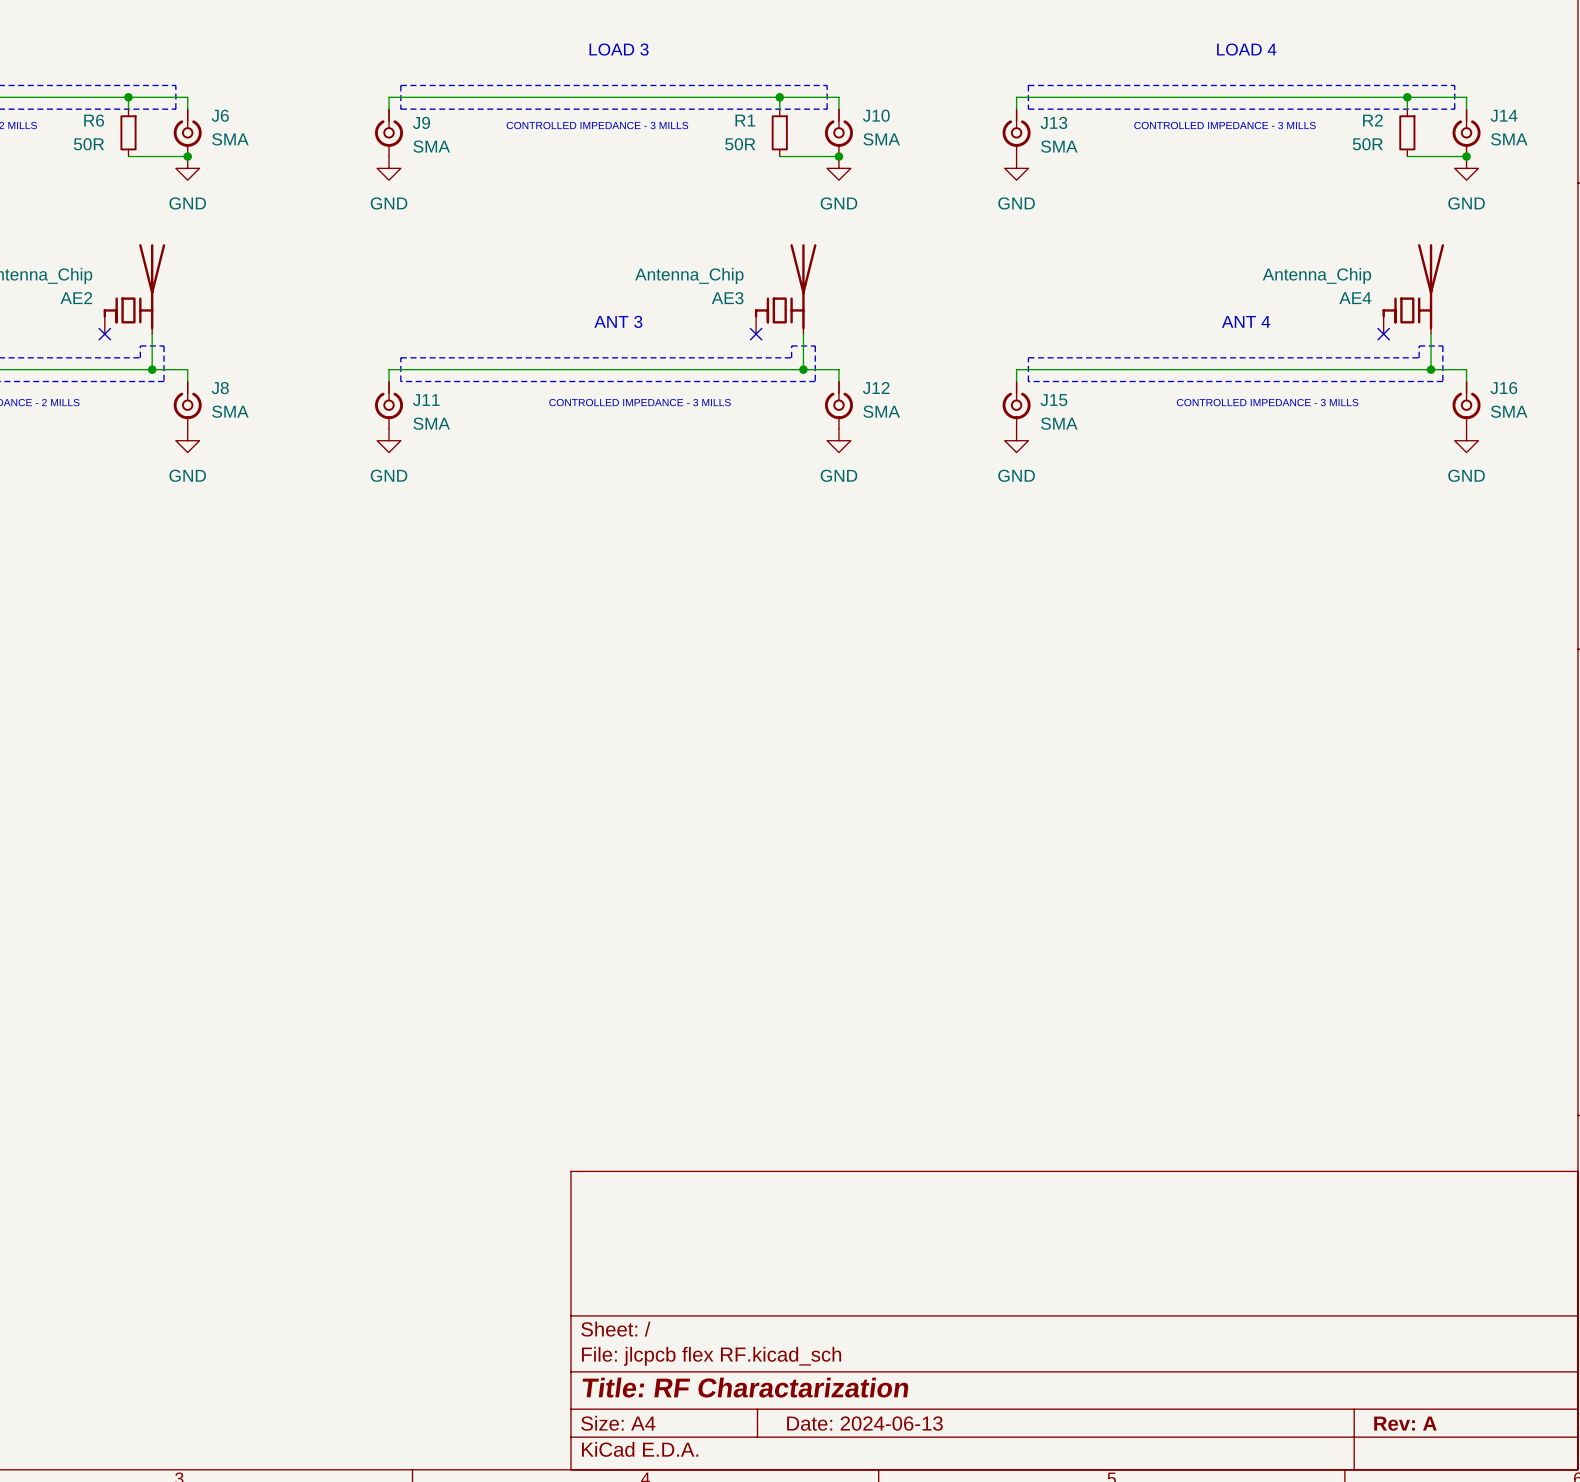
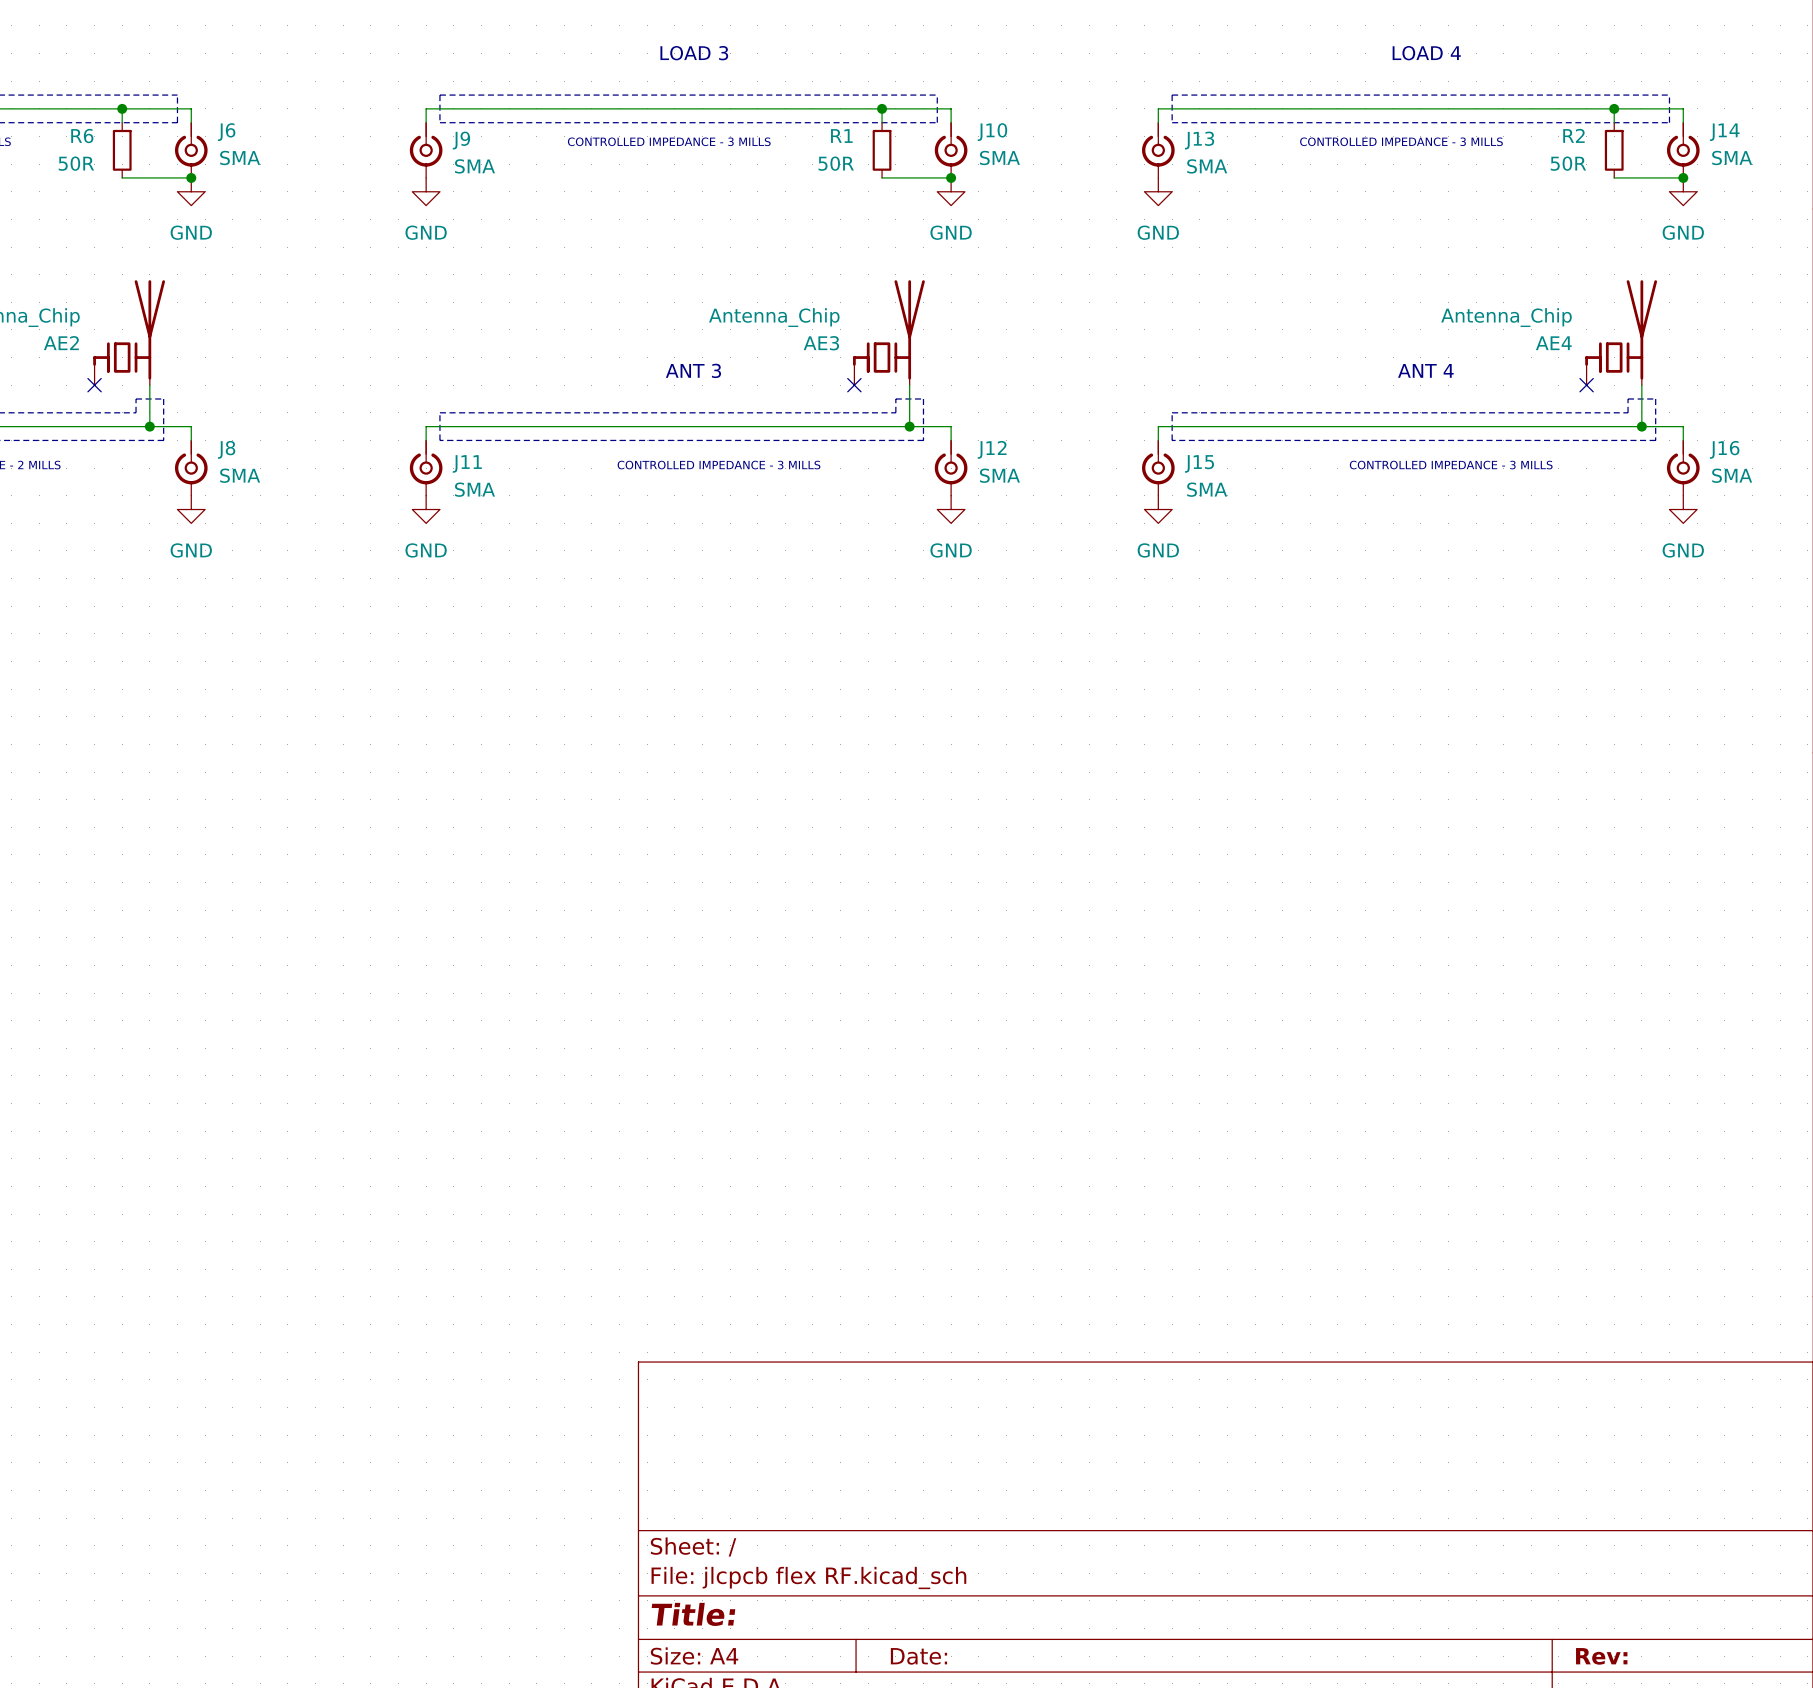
title block: Title: RF Charactarization (745, 1387) -> Title: (693, 1614)
title block: Date: 2024-06-13 (864, 1423) -> Date: (918, 1656)
title block: Rev: A (1405, 1423) -> Rev: (1601, 1656)

